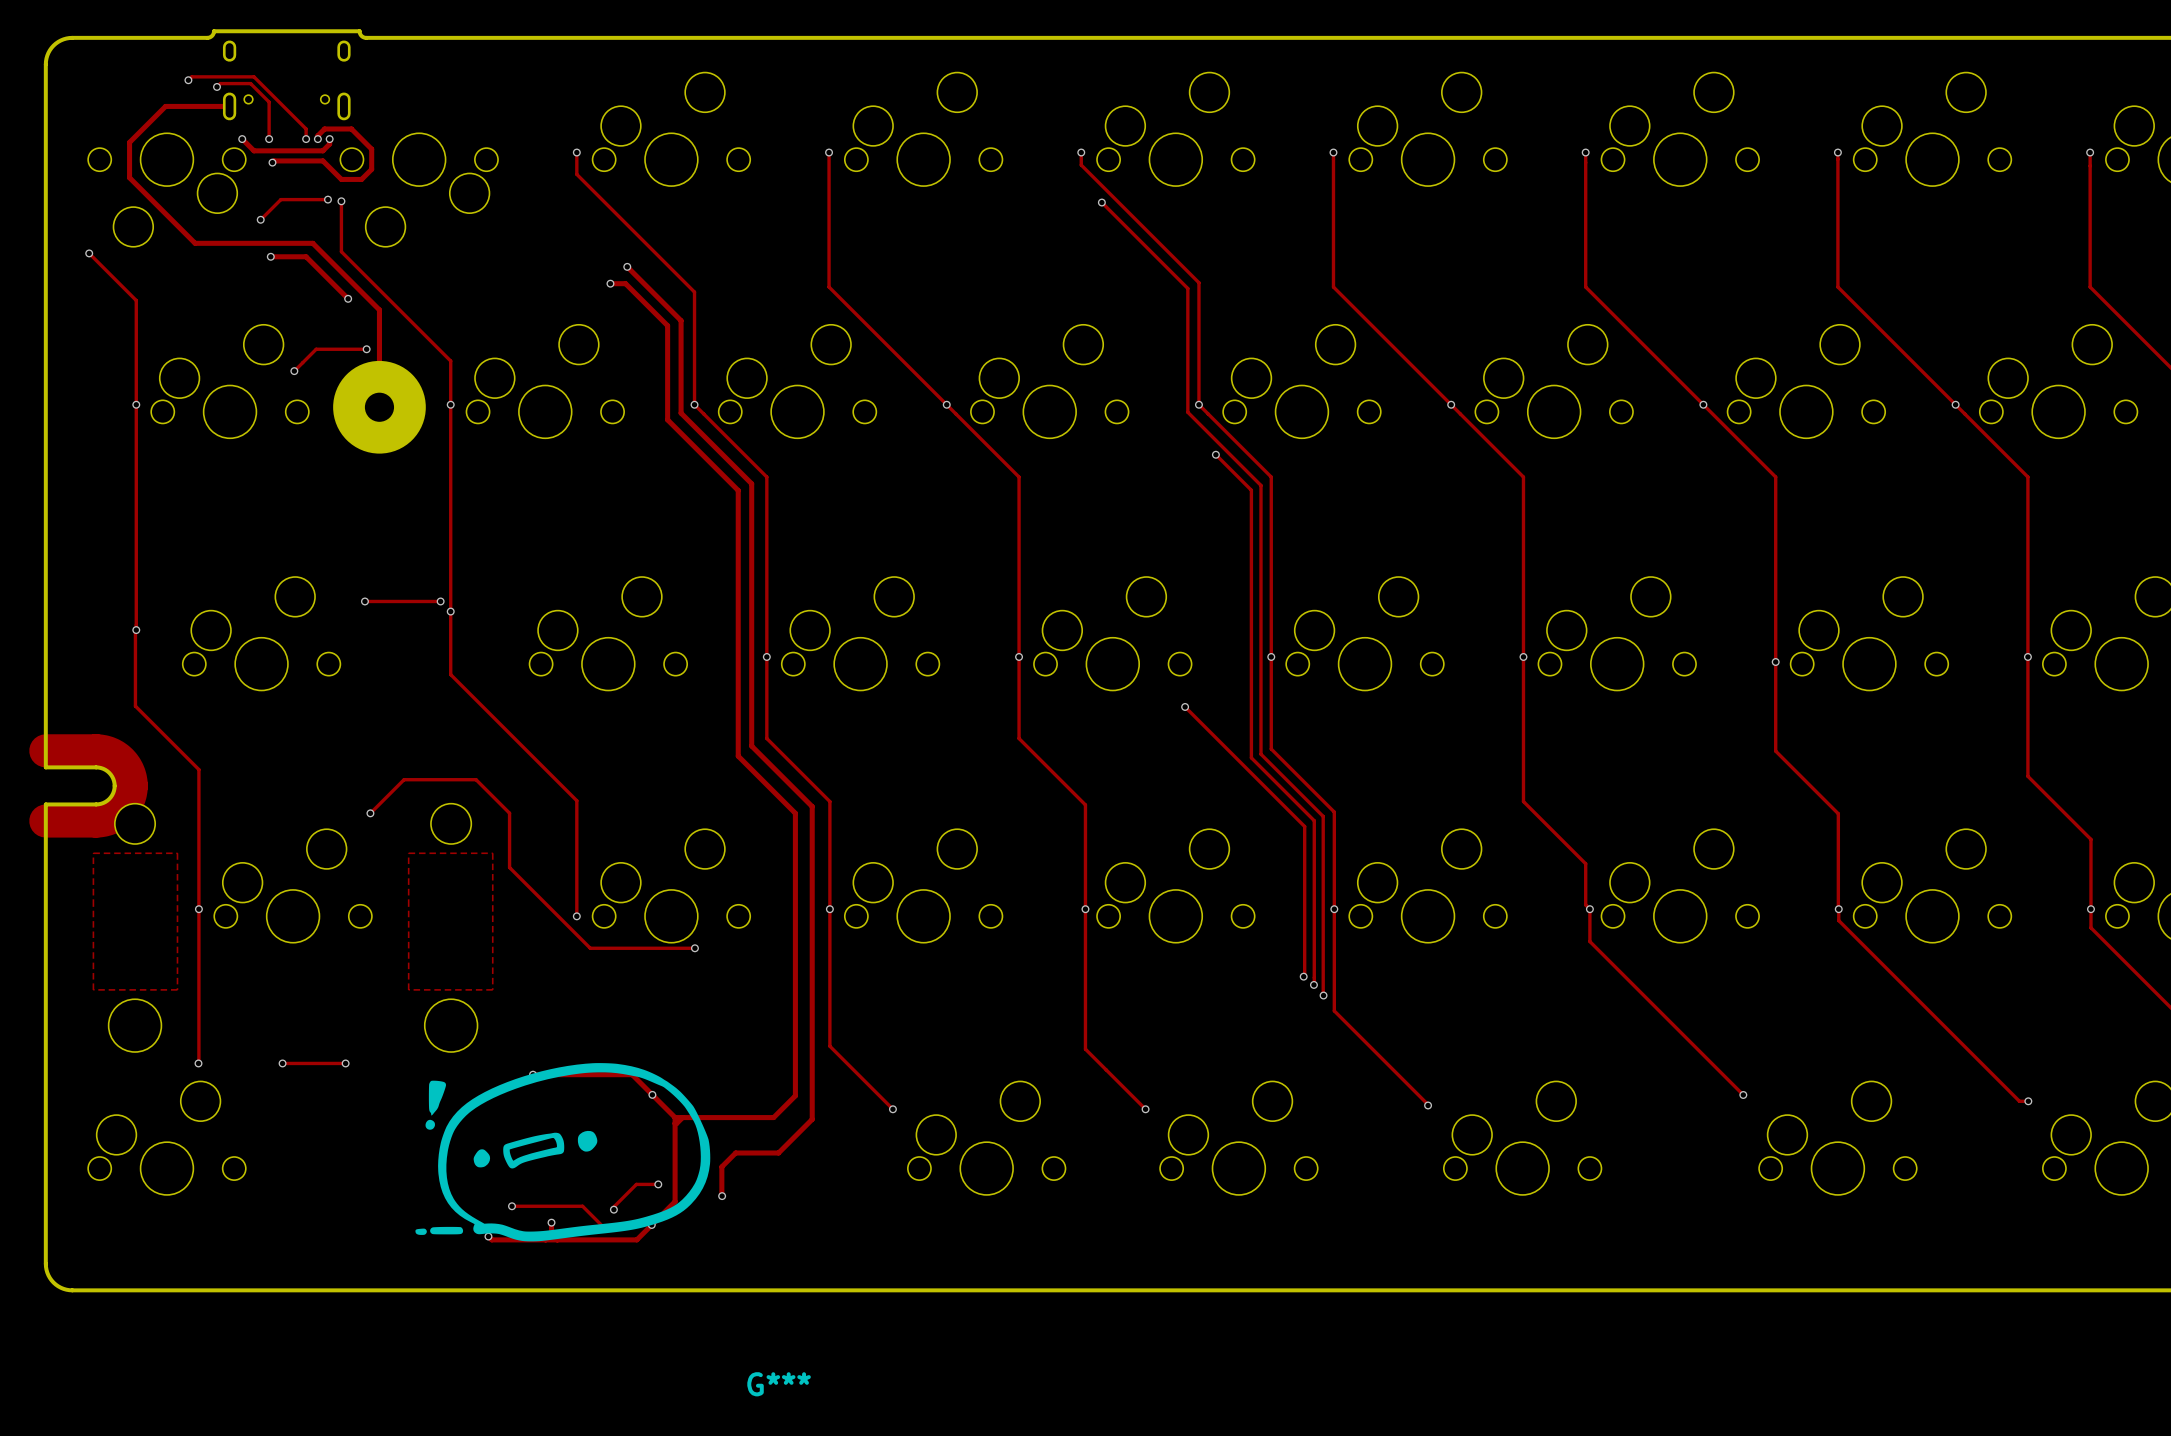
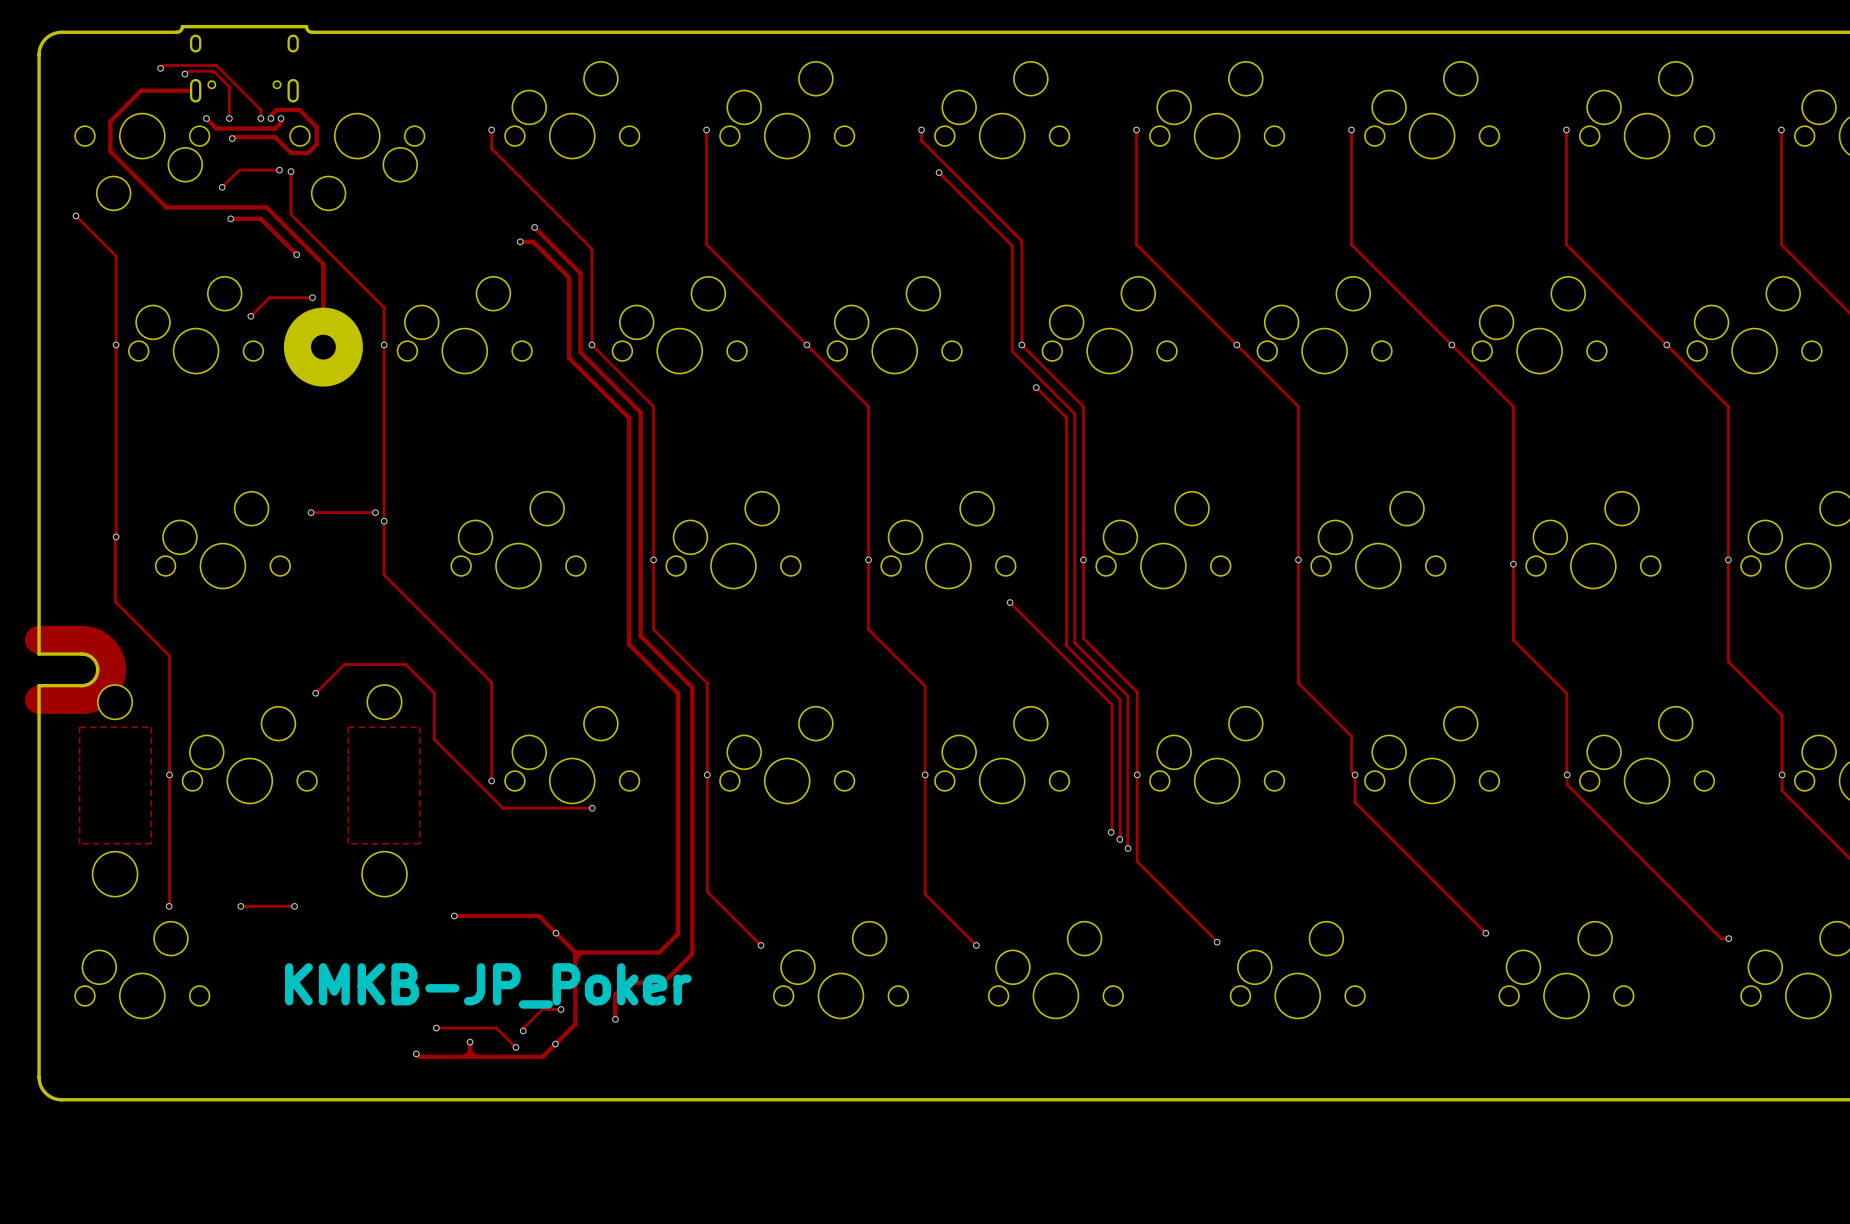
G***: (562, 1152) -> none
text: none -> KMKB-JP_Poker (488, 985)

